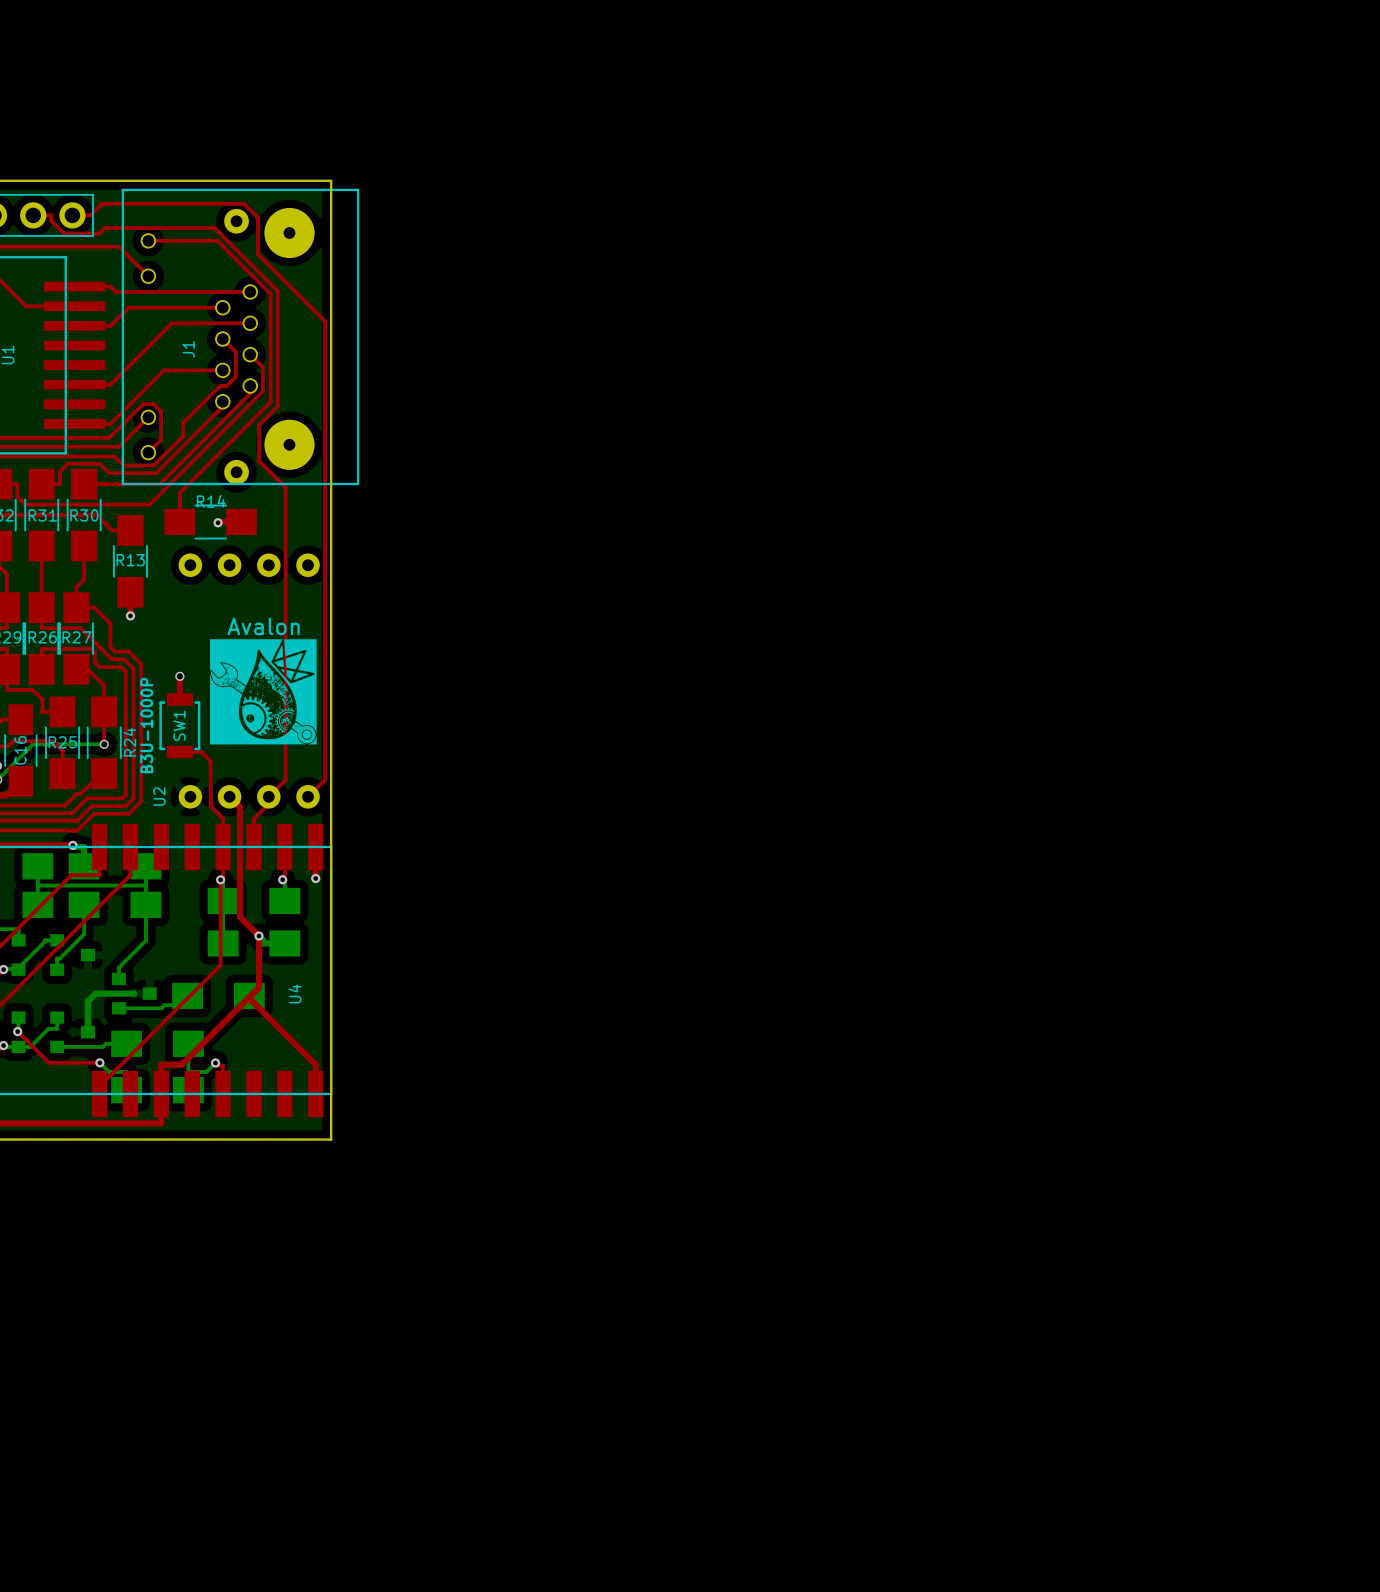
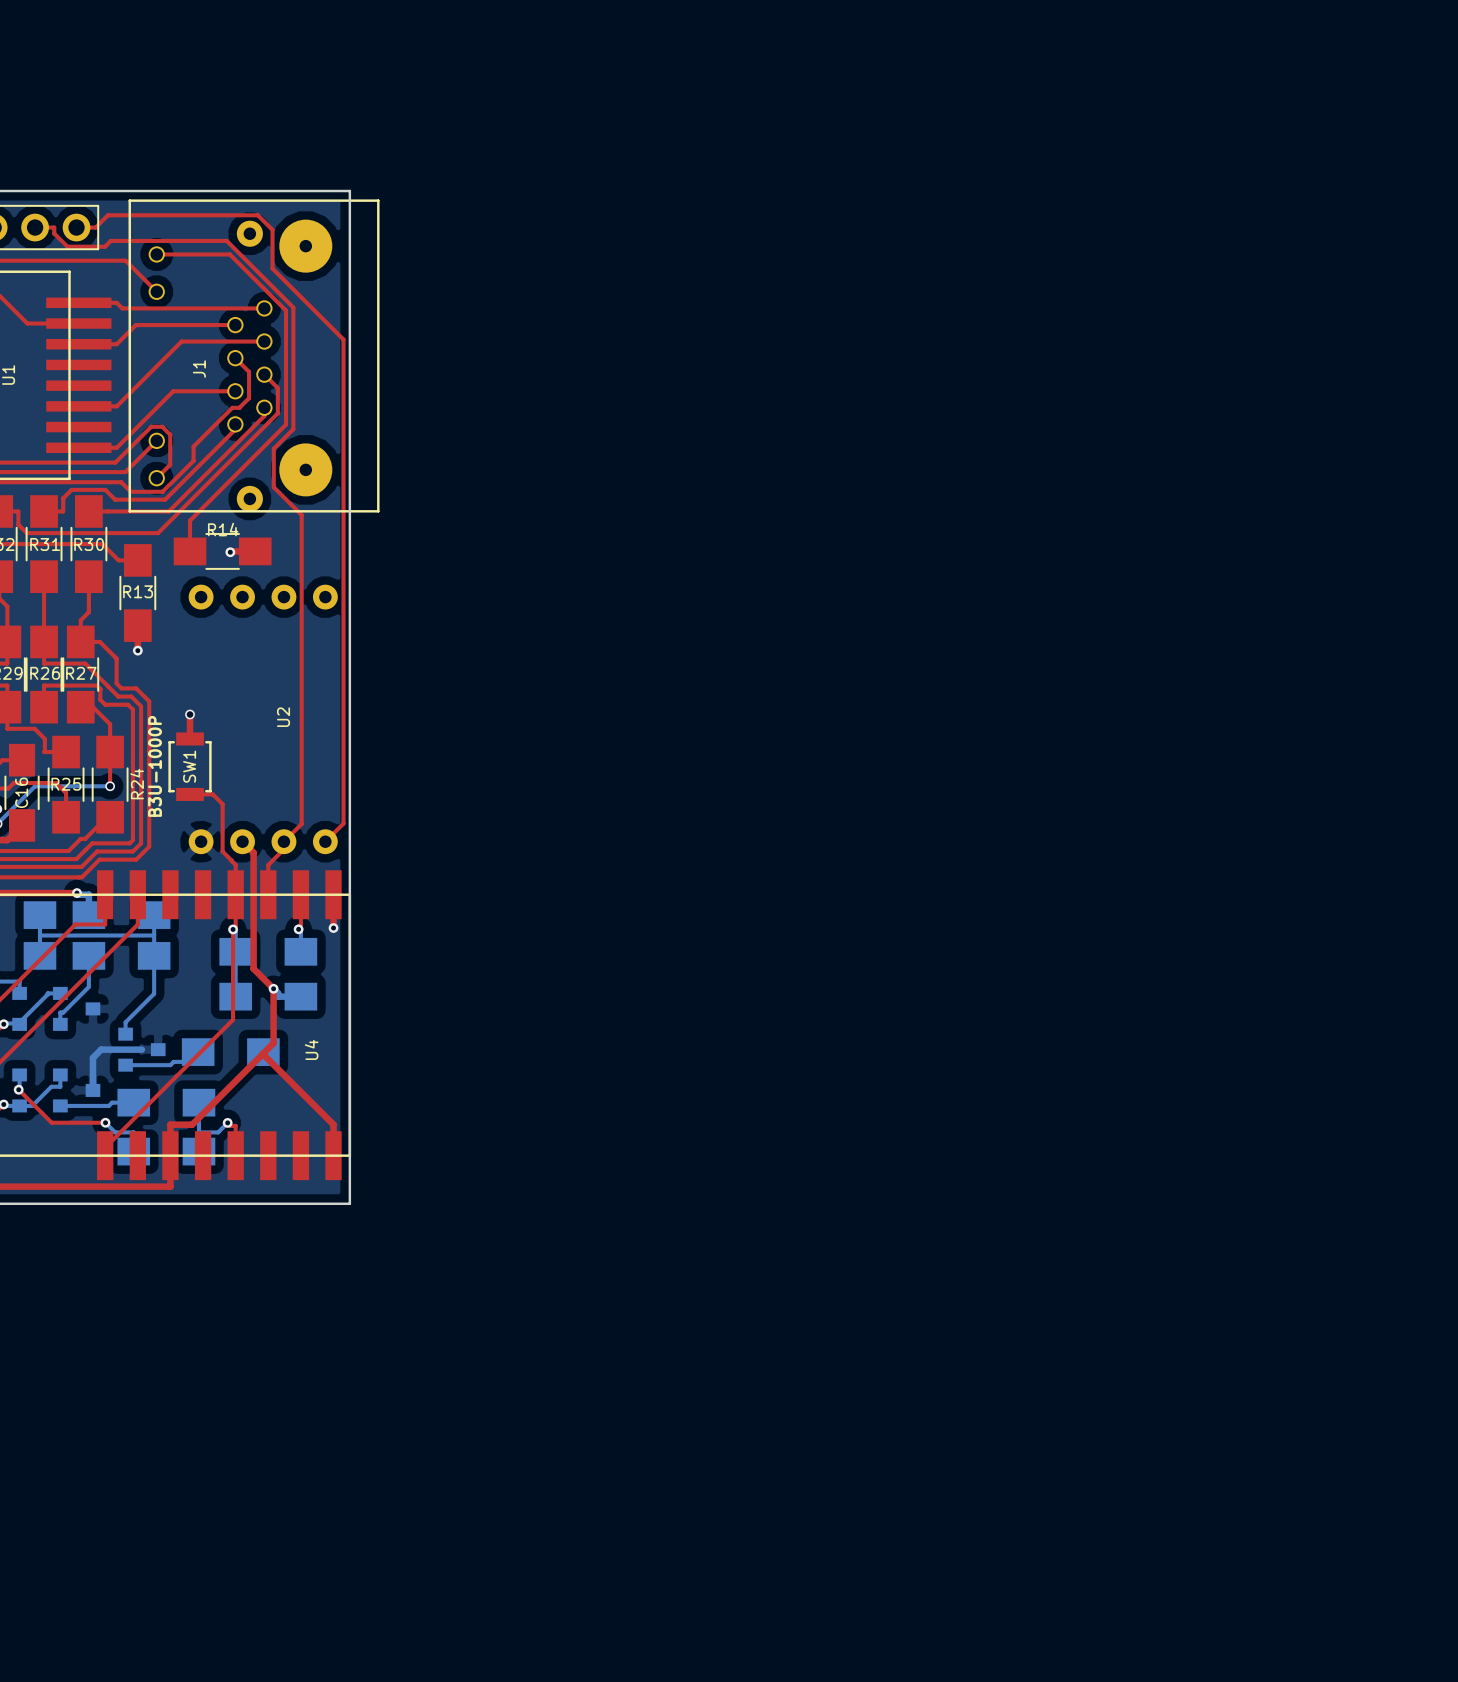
text: Avalon (263, 626) -> none
drawing: [209, 639, 317, 745] -> none
U2 name position: U2 (159, 796) -> U2 (283, 717)

